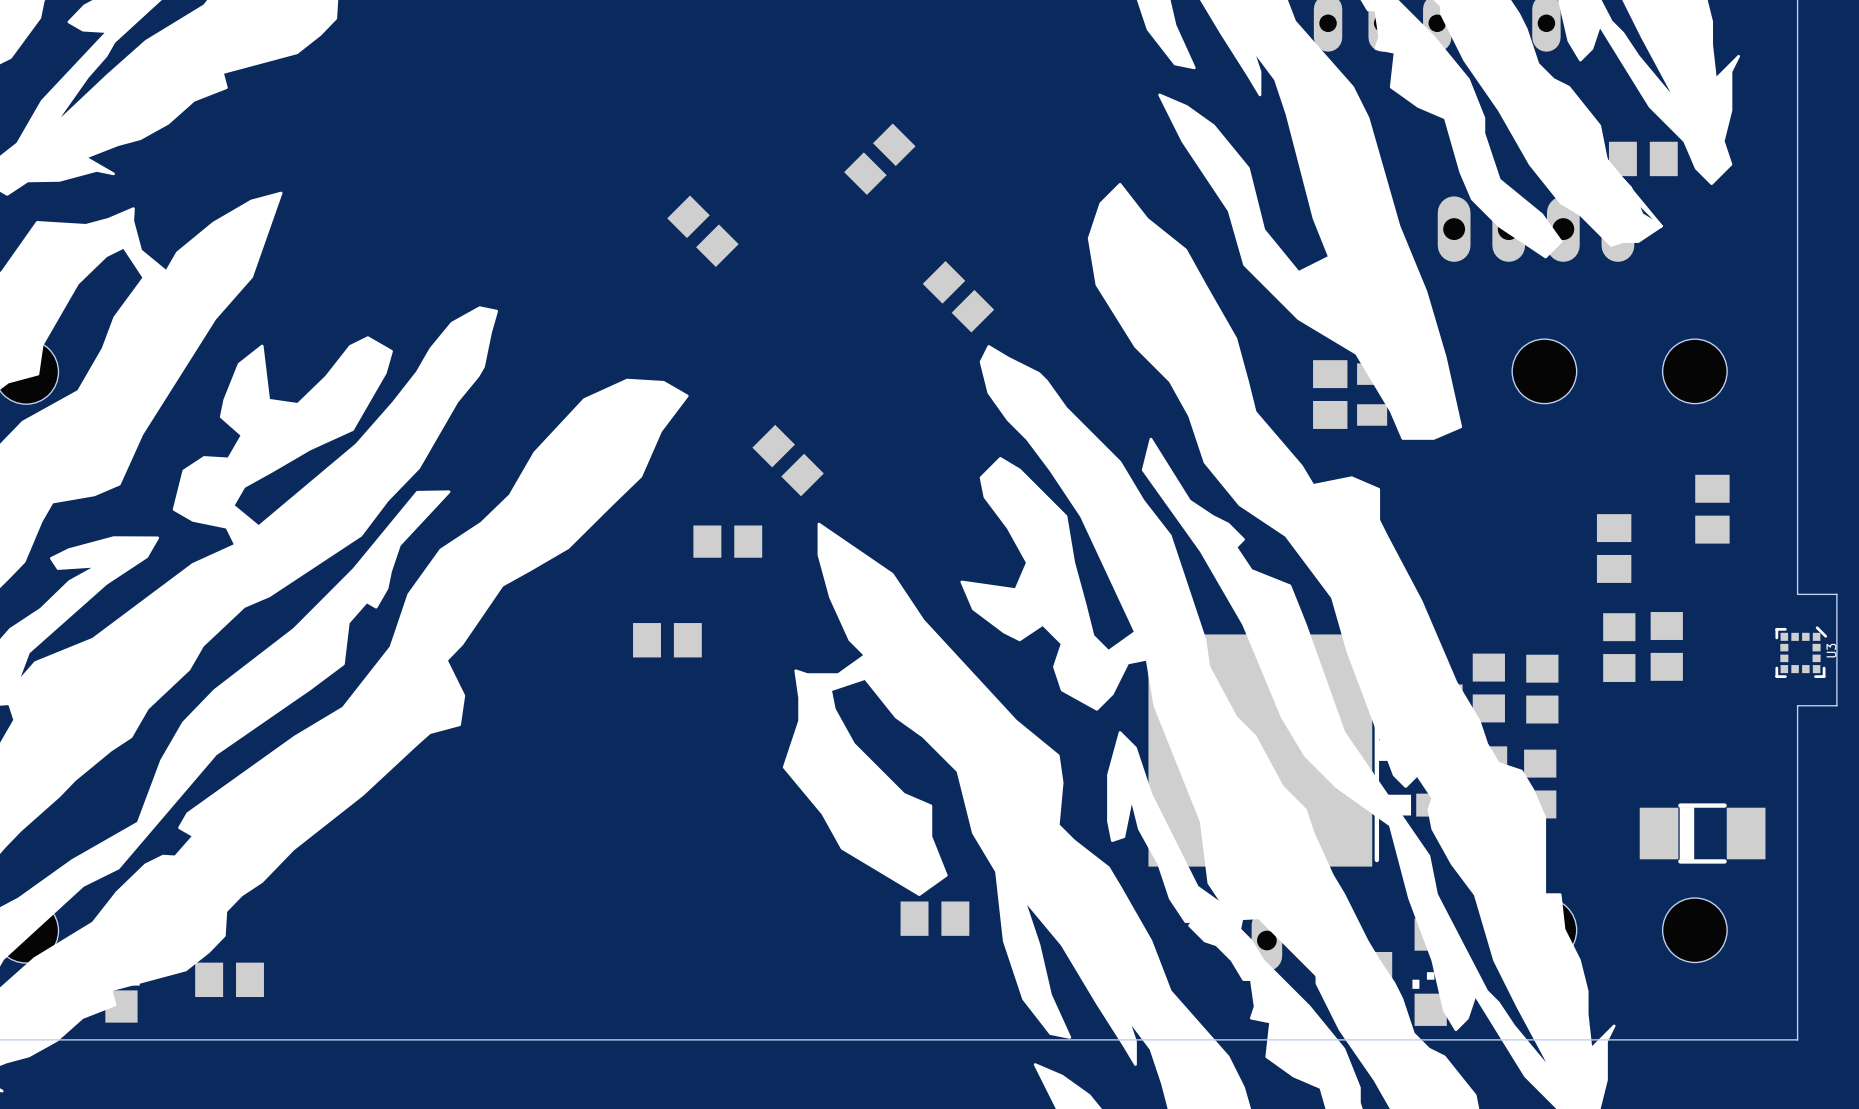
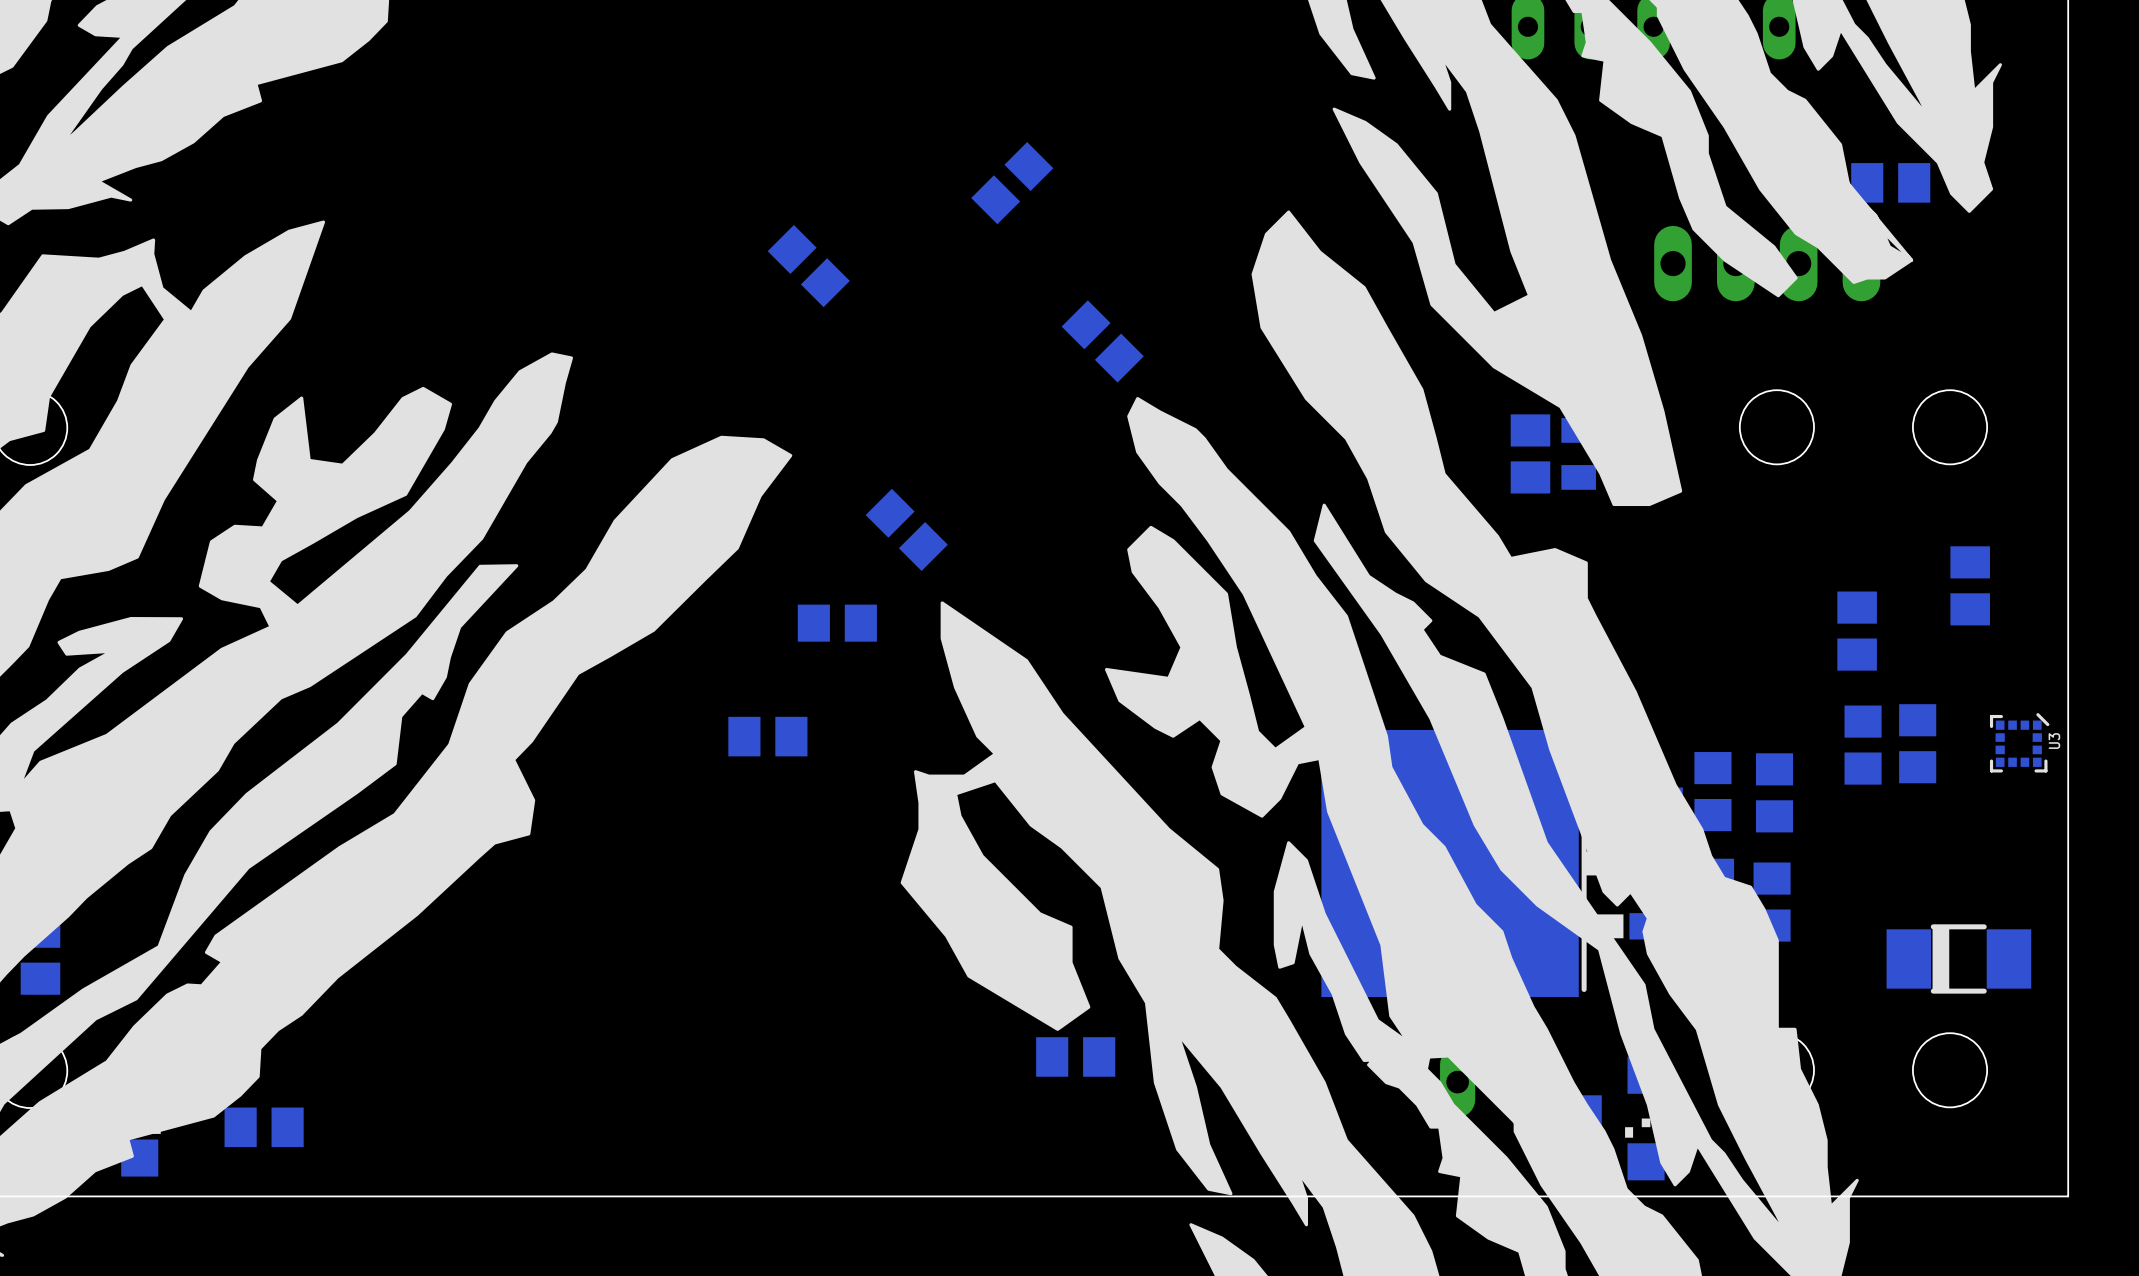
board edge: (1797, 594) (1836, 594) (1836, 705) (1797, 705) -> (2068, 683) (2068, 811)
U3 position: (1801, 652) -> (2019, 742)
part: none -> (40, 955)

